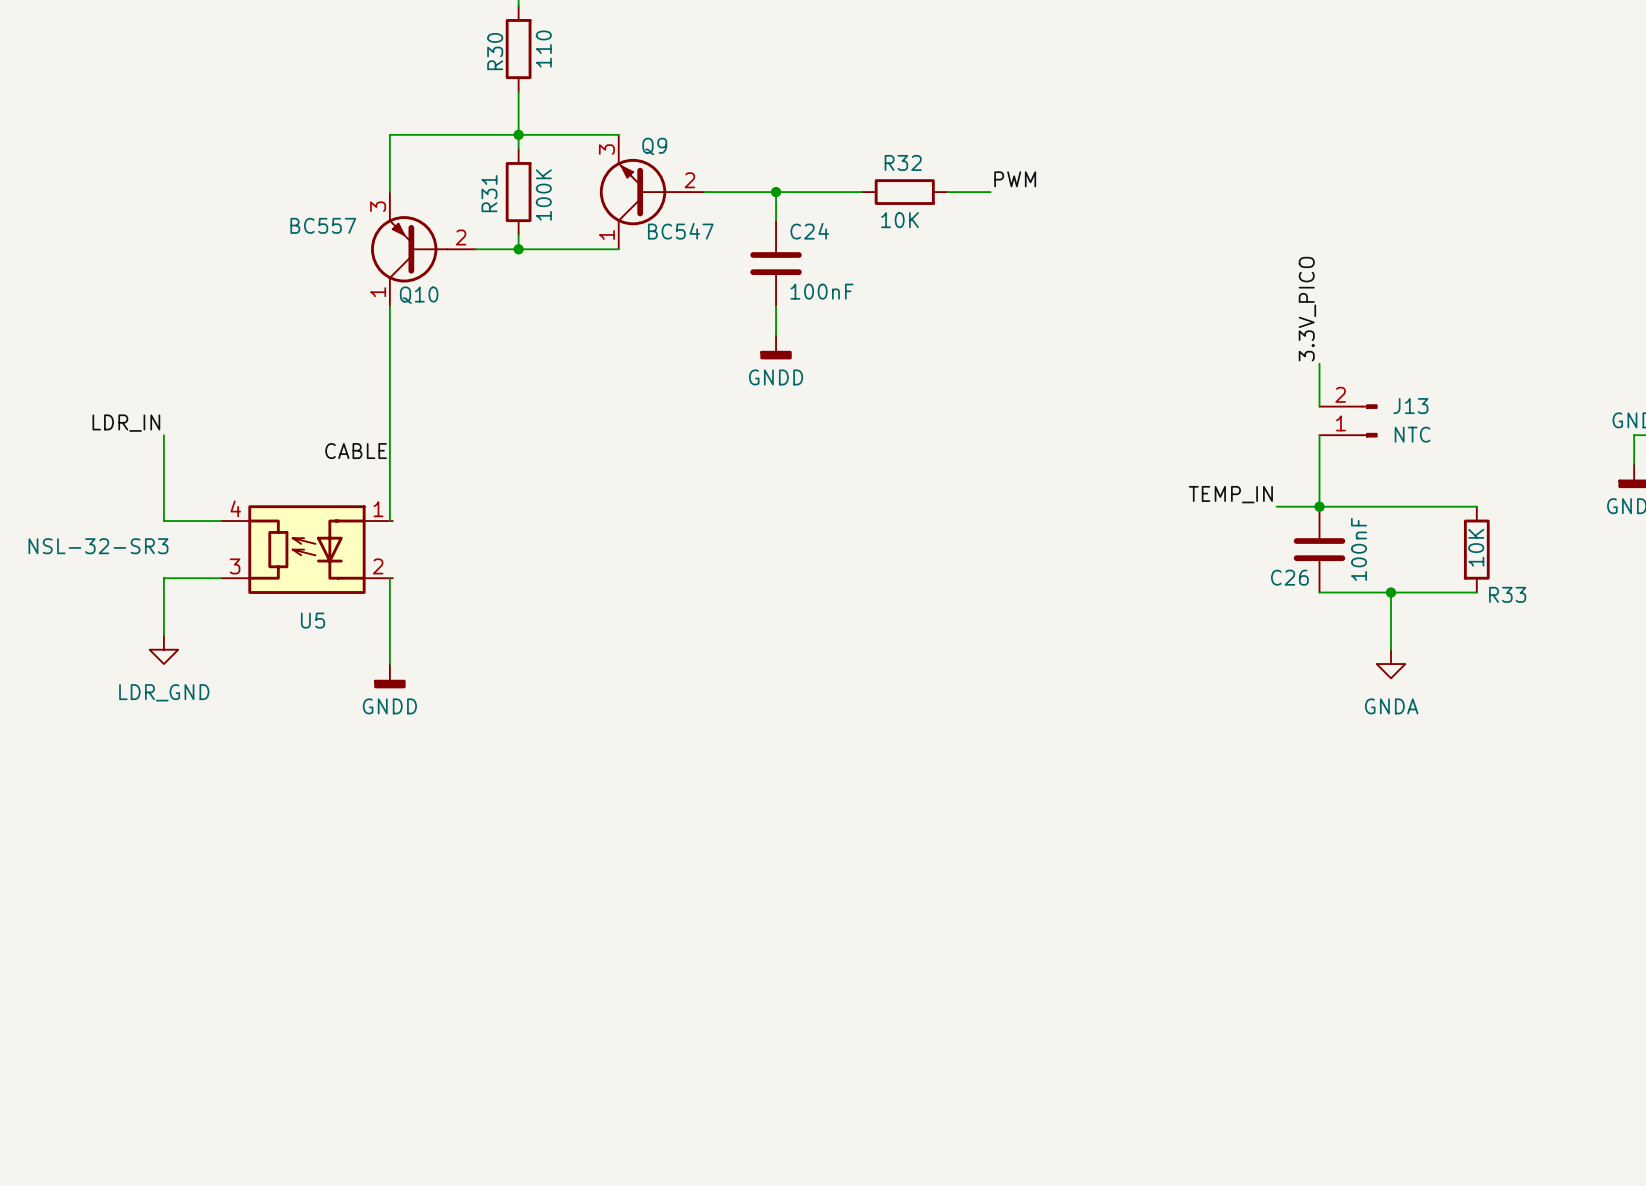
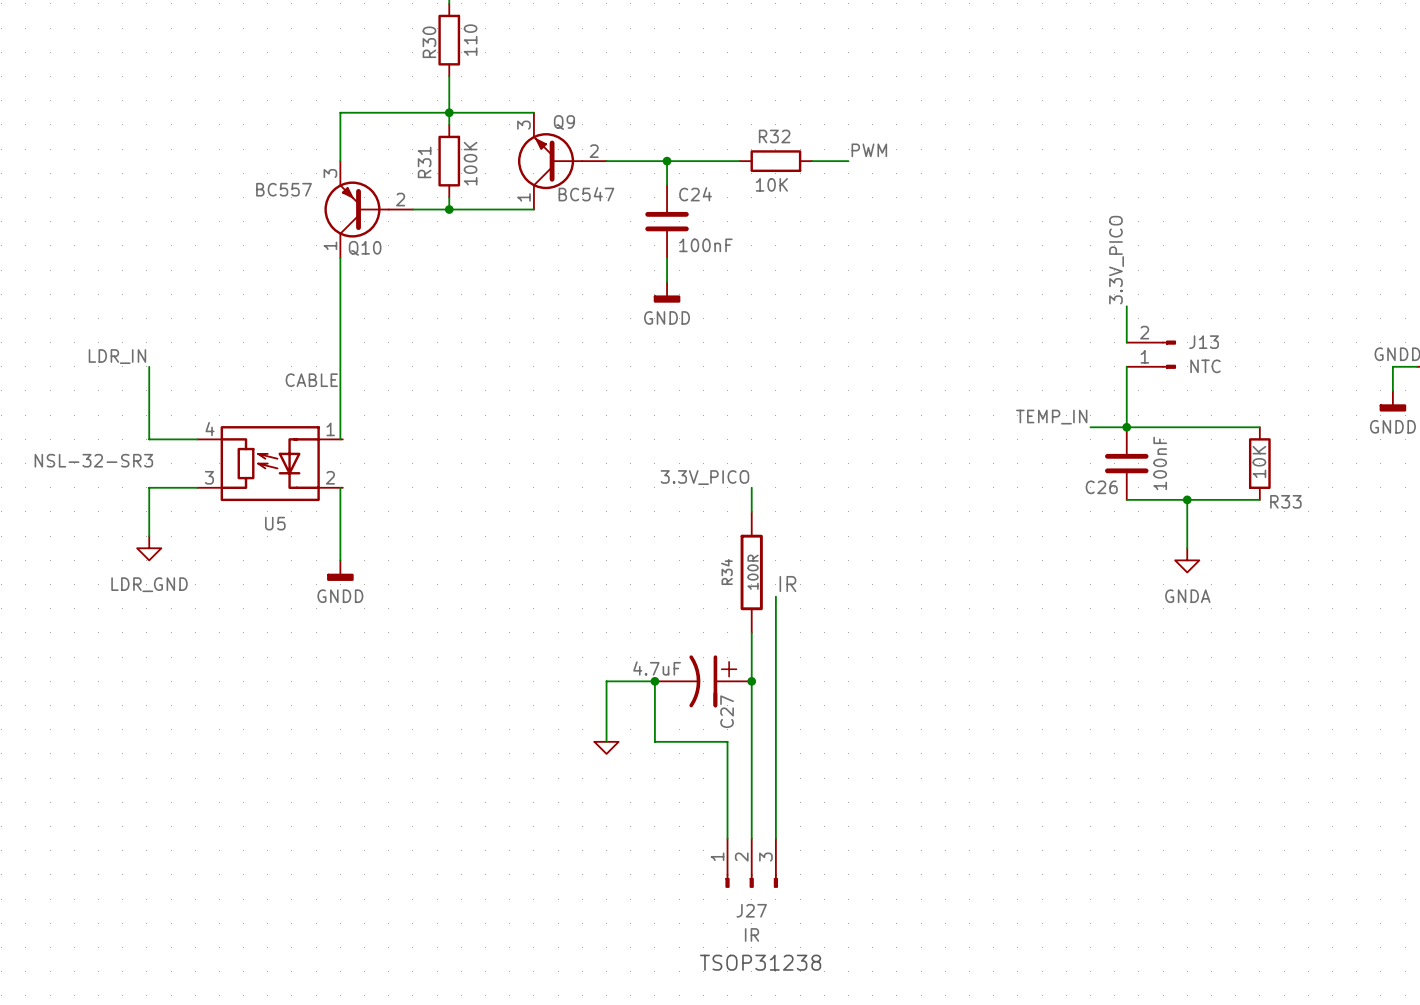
label: none -> 3.3V_PICO (704, 477)
wire: none -> (751, 487) (751, 511)
R34: none -> 100R (751, 572)
label: none -> IR (787, 584)
wire: none -> (775, 596) (775, 838)
wire: none -> (751, 632) (751, 838)
junction: none -> (654, 681)
C27: none -> 4.7uF (703, 681)
junction: none -> (751, 681)
wire: none -> (606, 741) (606, 681) (654, 681) (654, 741) (727, 741) (727, 838)
power symbol: none -> (606, 747)
J27: none -> IR (751, 863)
text: none -> TSOP31238 (760, 962)

